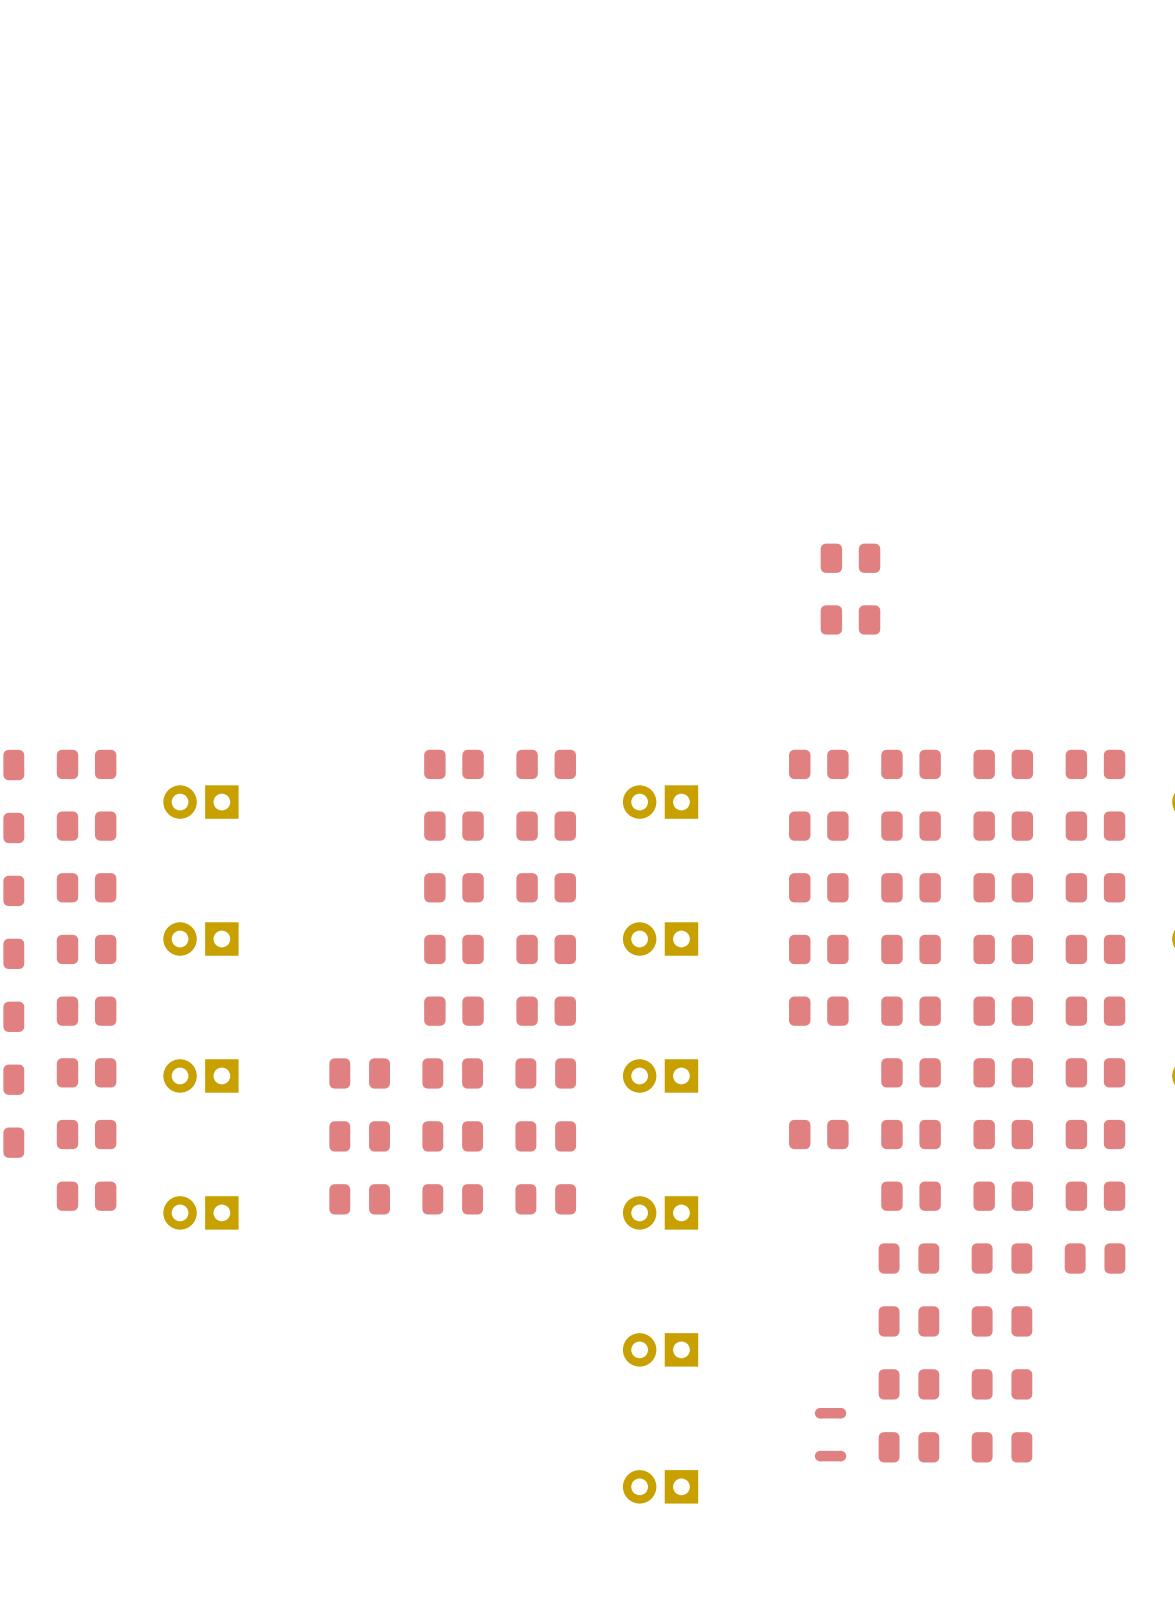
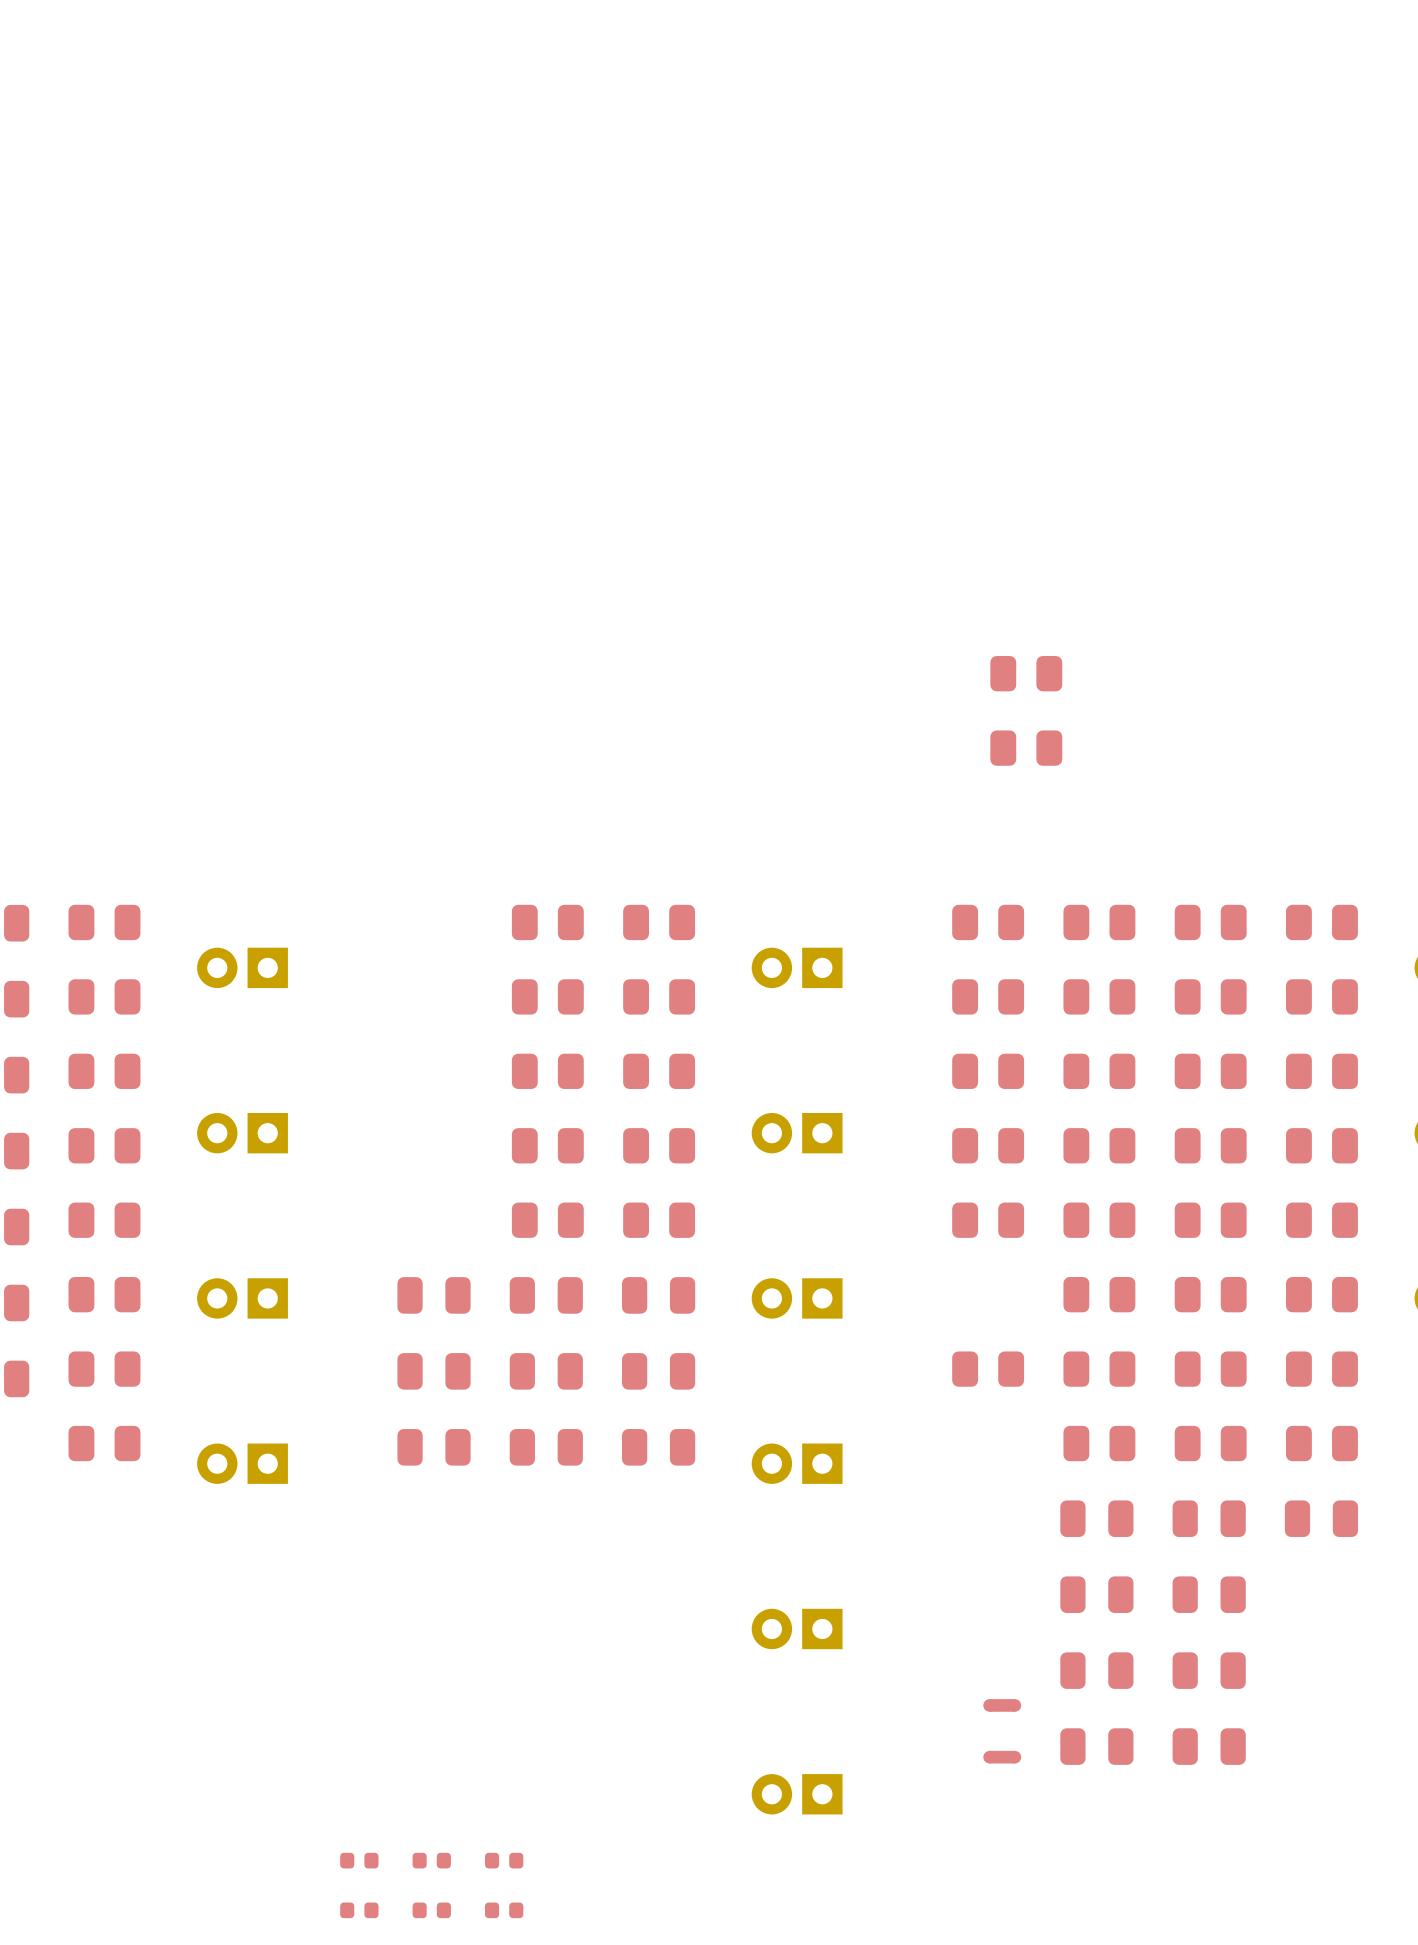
part: none -> (359, 1860)
part: none -> (431, 1860)
part: none -> (504, 1860)
part: none -> (359, 1910)
part: none -> (431, 1910)
part: none -> (504, 1910)

